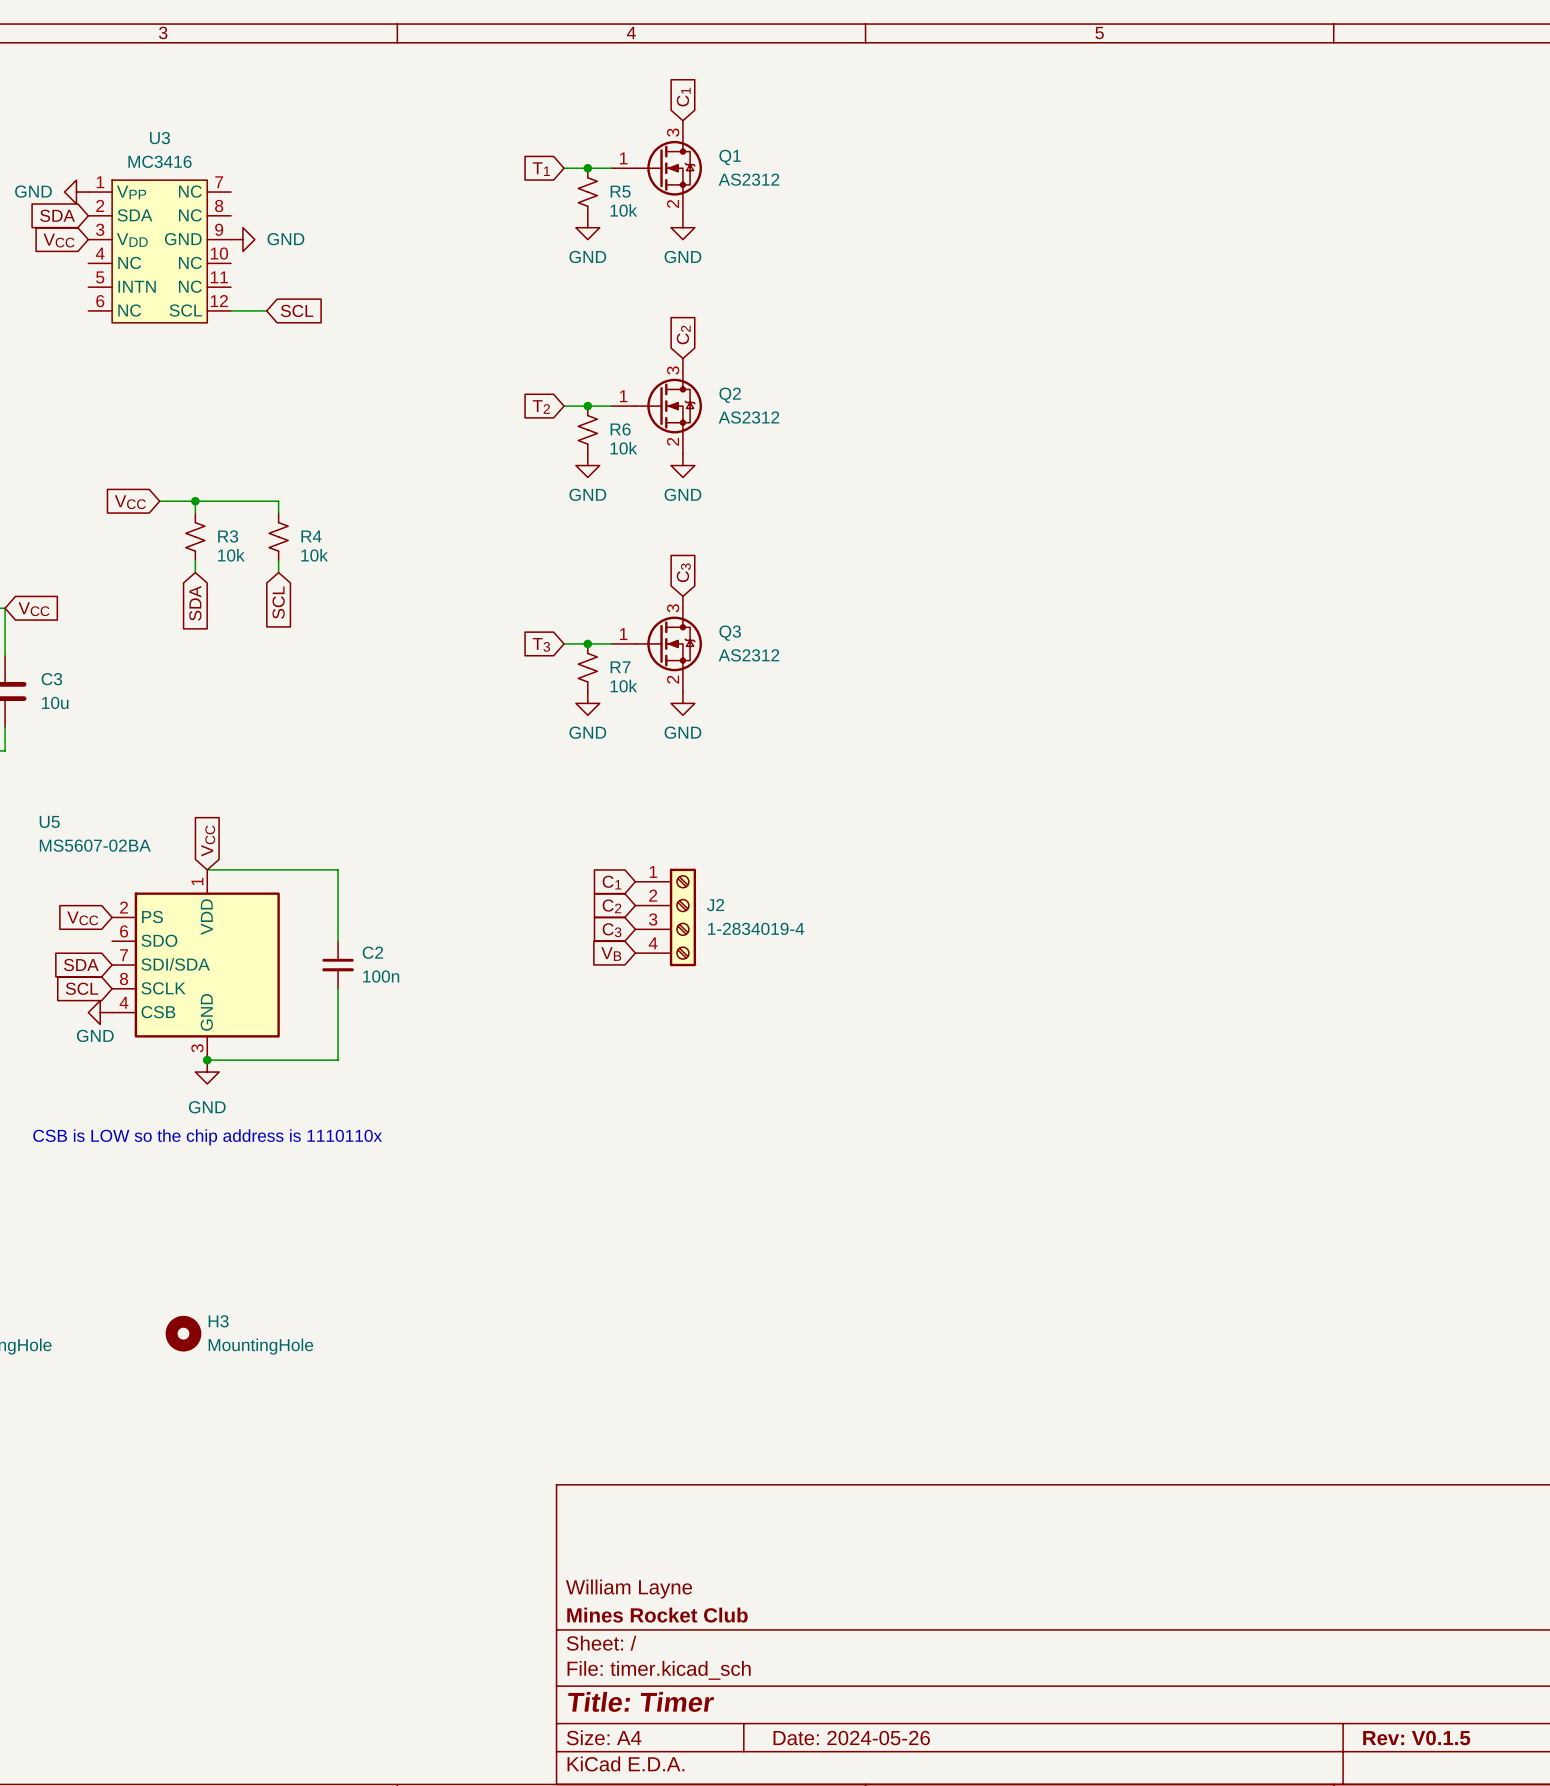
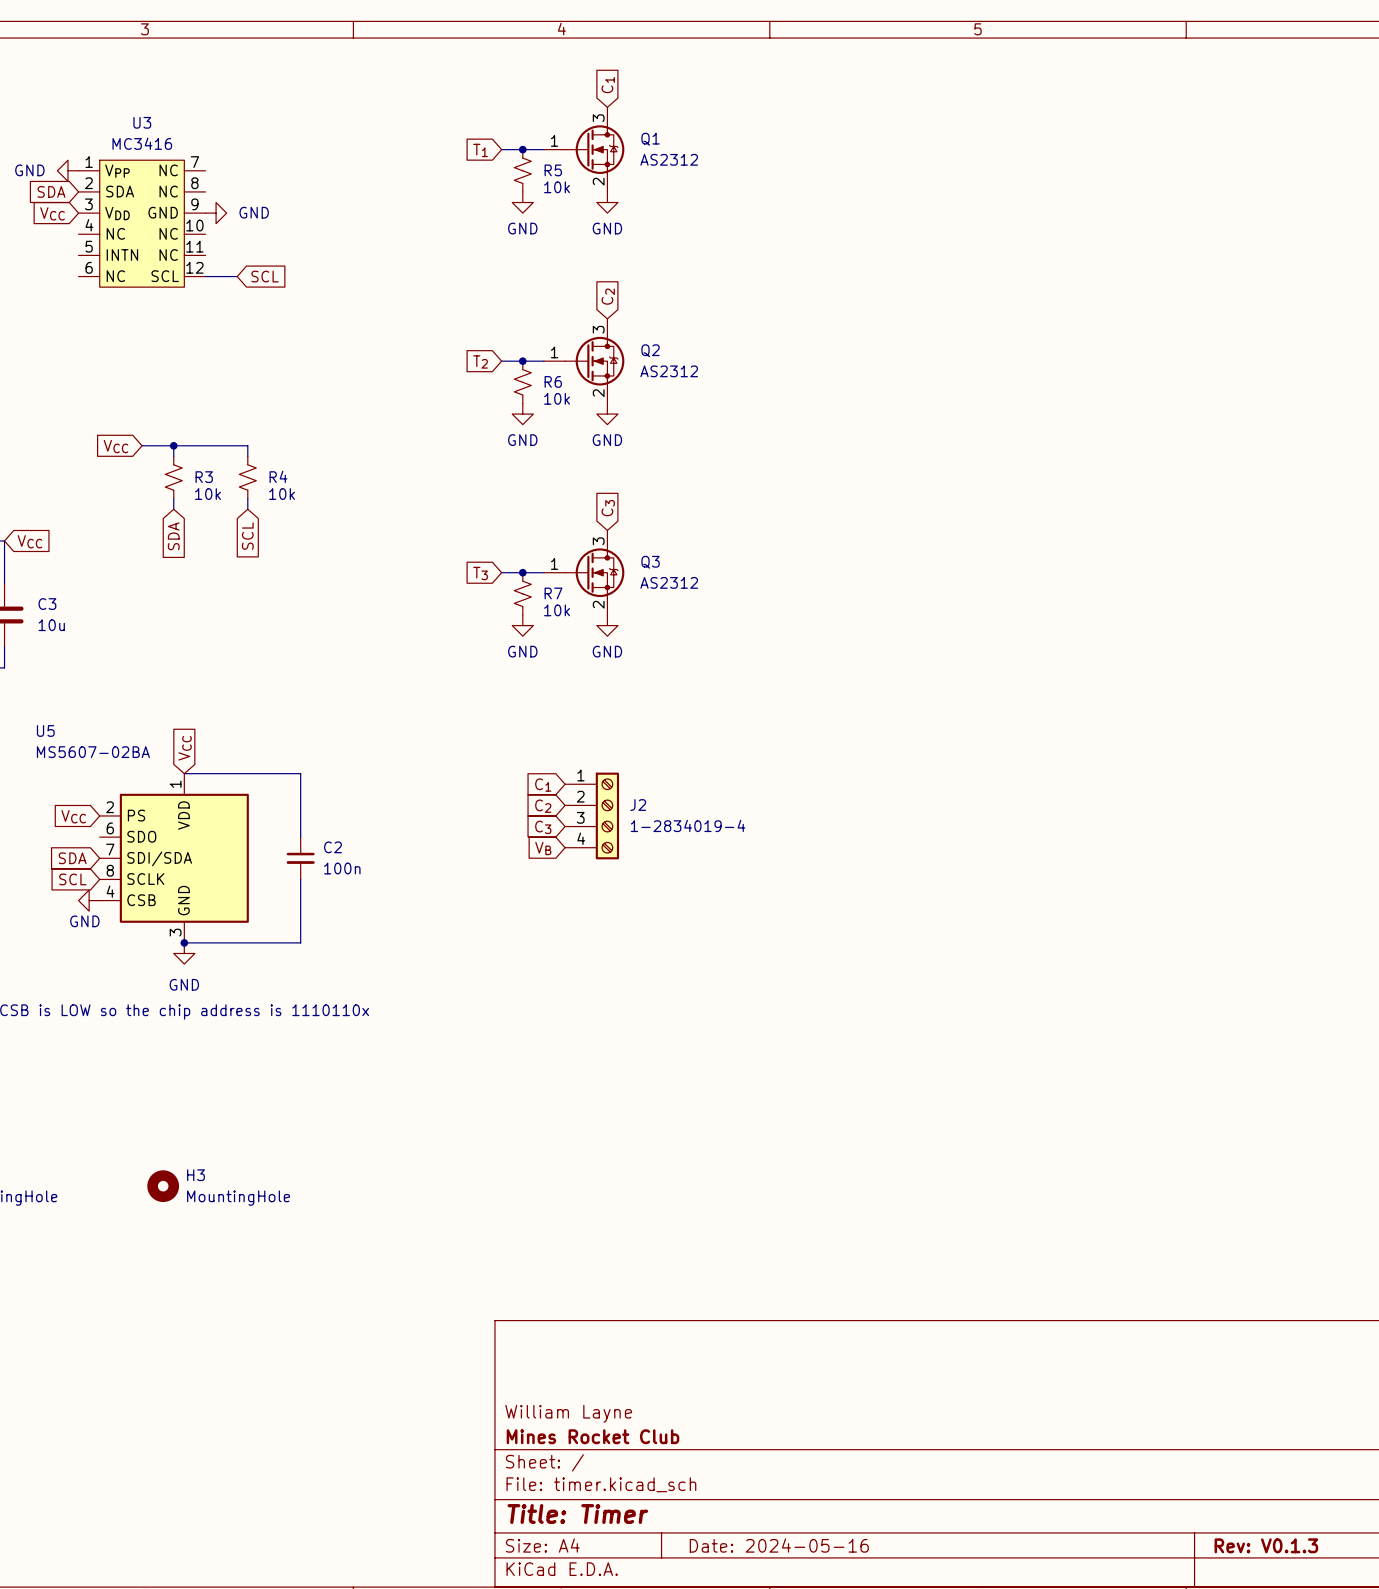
title block: Date: 2024-05-26 (851, 1738) -> Date: 2024-05-16 (779, 1545)
title block: Rev: V0.1.5 (1416, 1738) -> Rev: V0.1.3 (1266, 1545)

